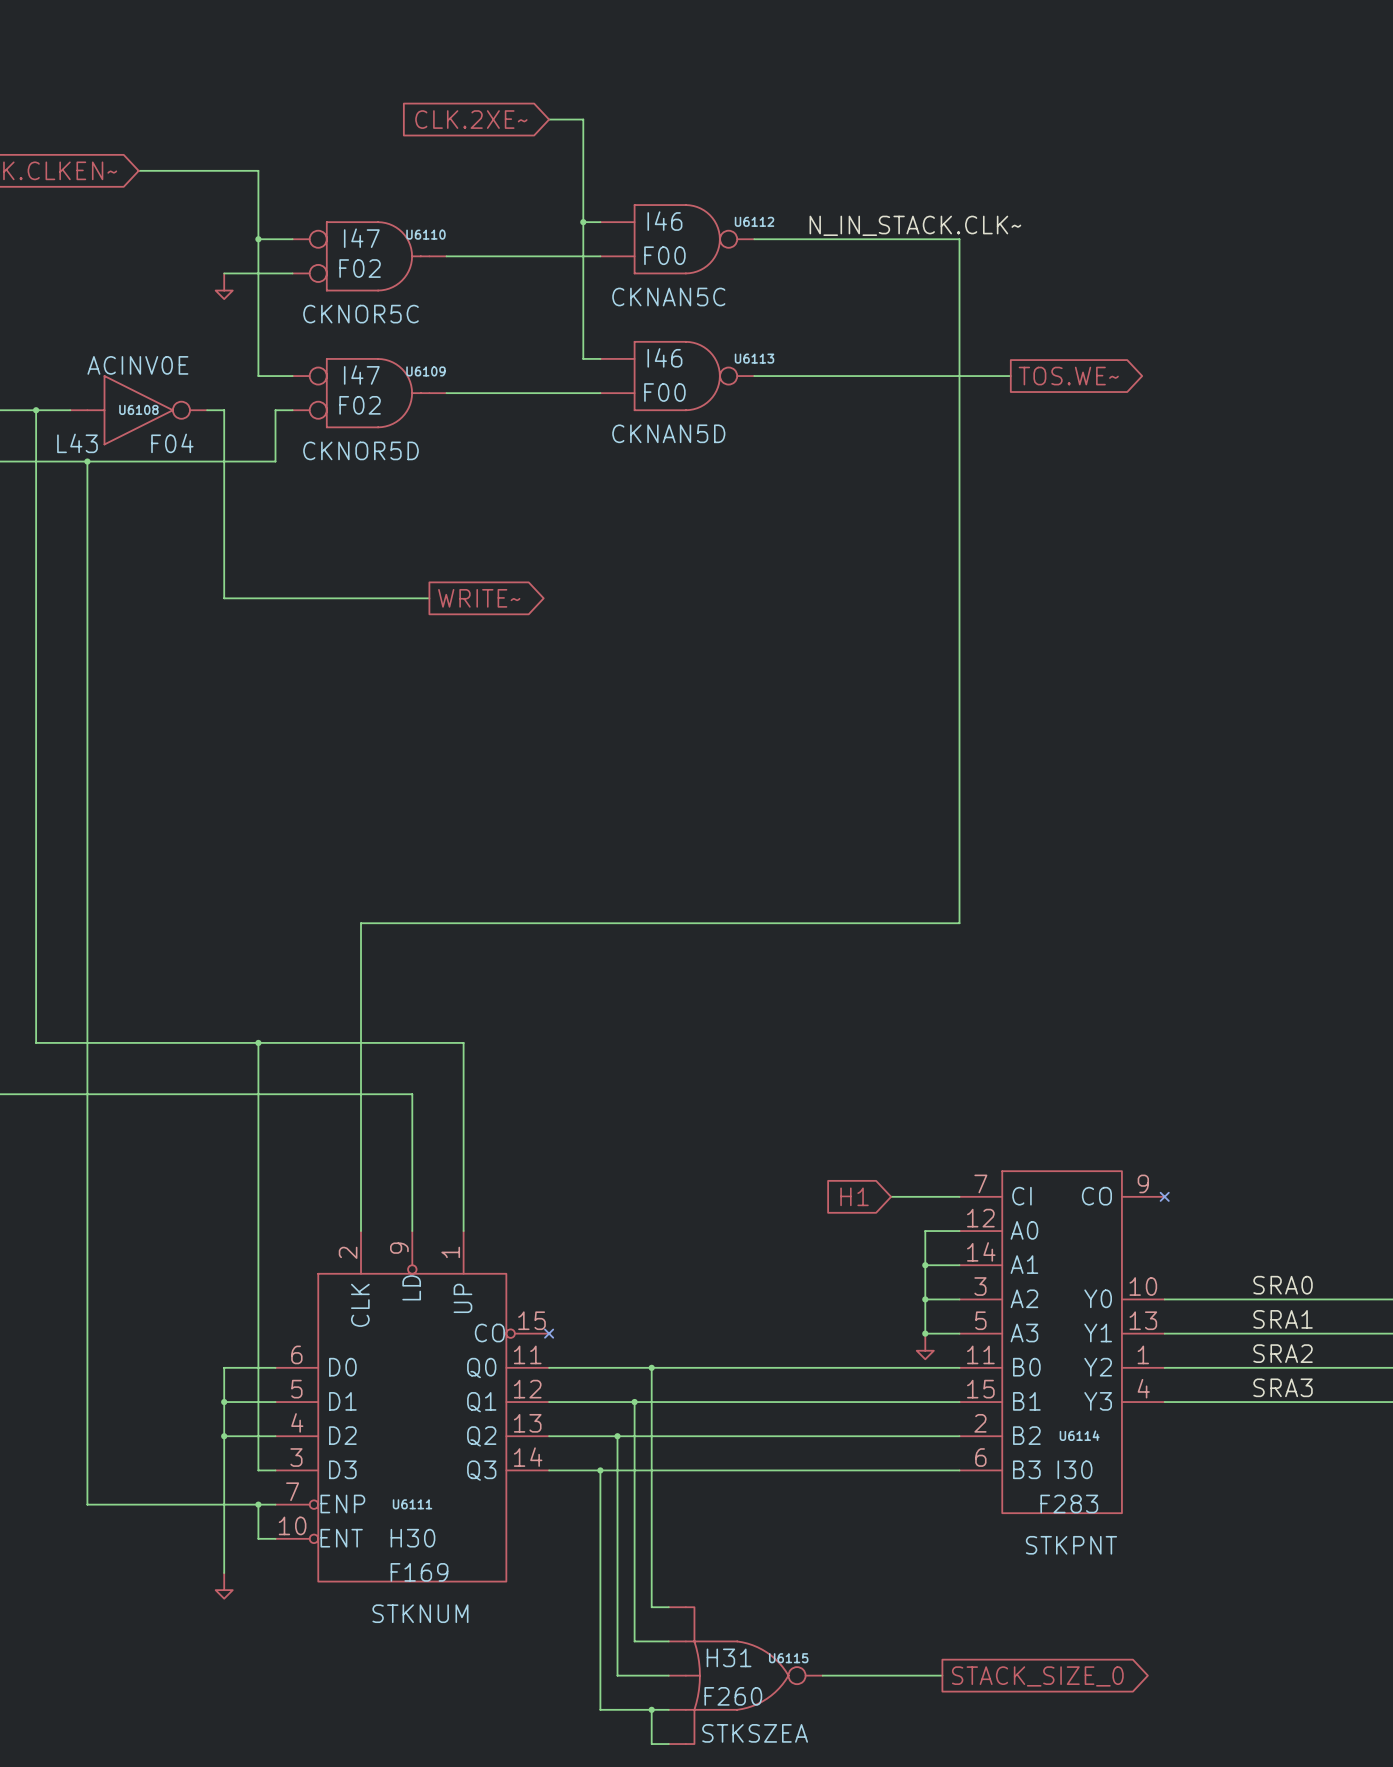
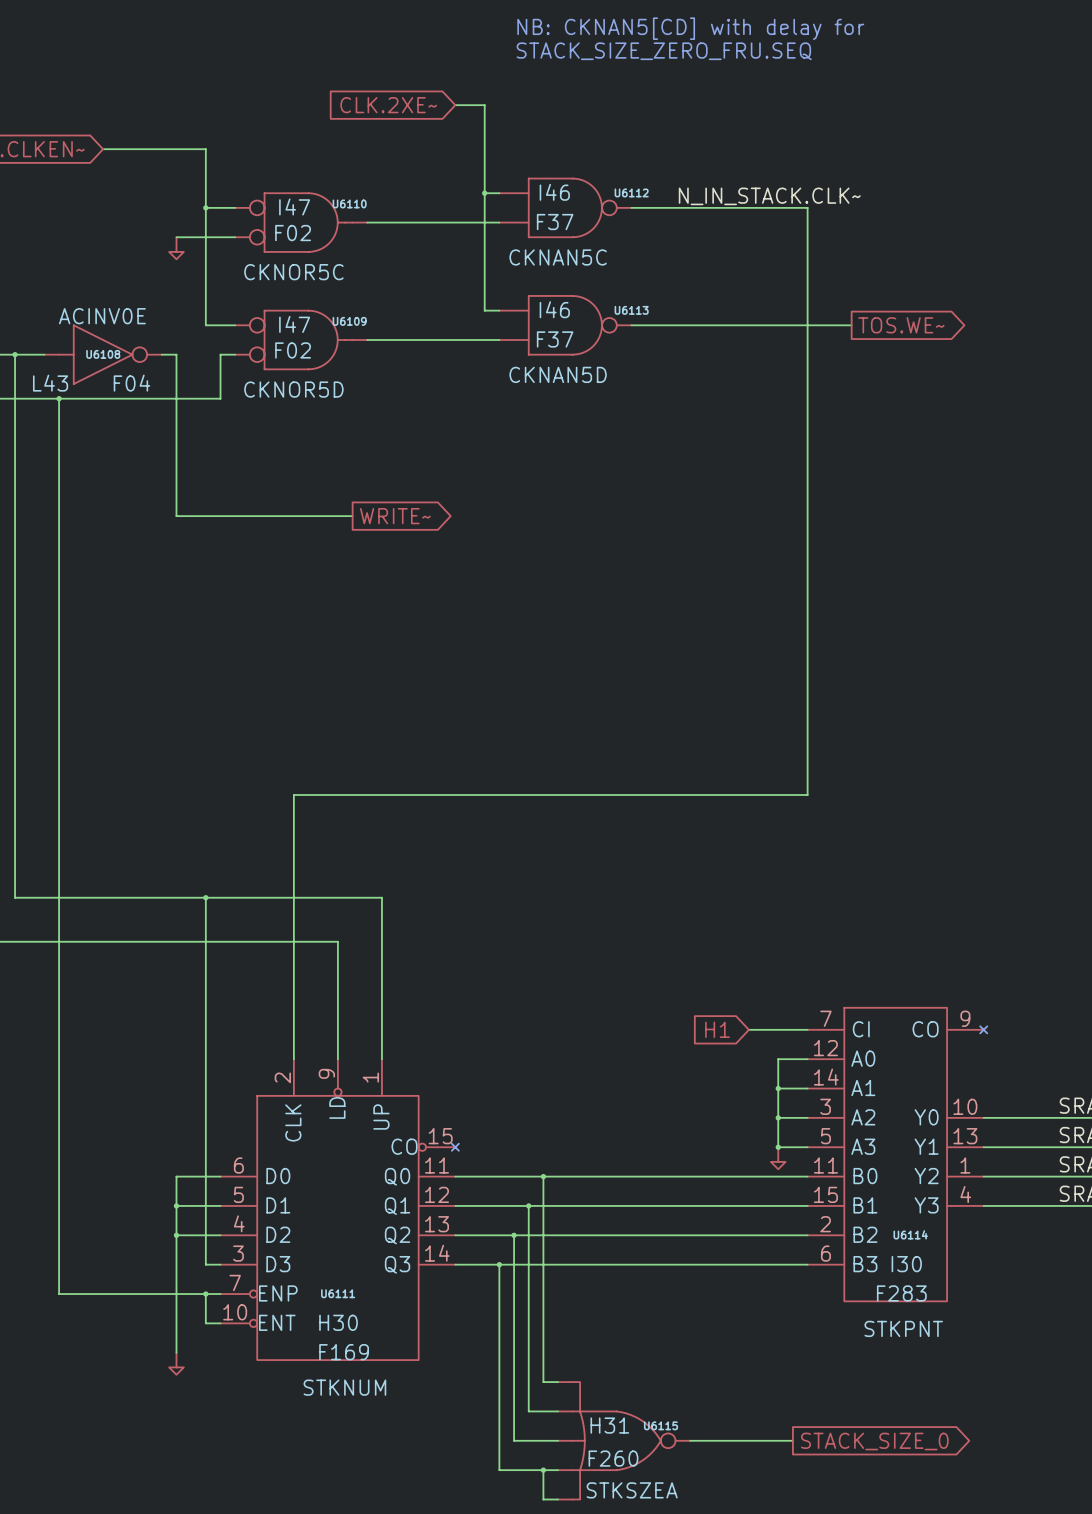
text: none -> NB: CKNAN5[CD] with delay for (690, 28)
text: none -> STACK_SIZE_ZERO_FRU.SEQ (664, 51)
U6112 value: F00 (664, 255) -> F37 (555, 222)
U6113 value: F00 (664, 392) -> F37 (555, 339)

